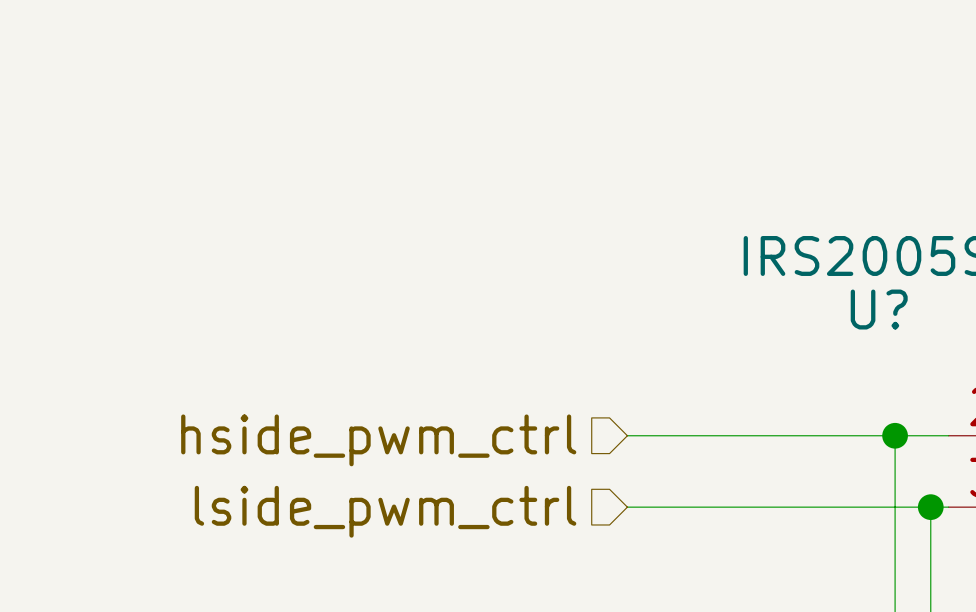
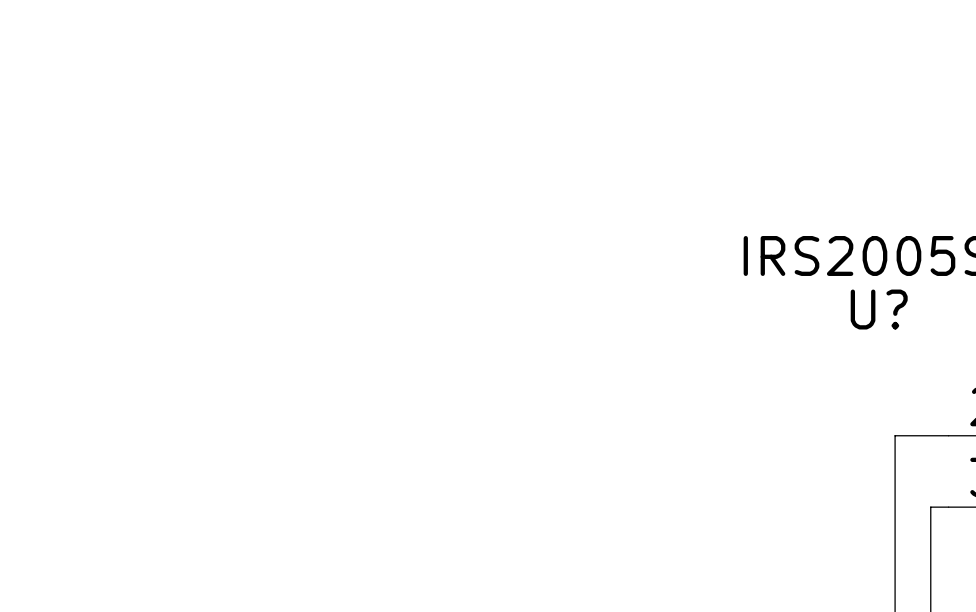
wire: (627, 435) (895, 435) -> none
junction: (895, 435) -> none
hierarchical label: hside_pwm_ctrl (378, 440) -> none
wire: (627, 507) (930, 507) -> none
junction: (930, 507) -> none
hierarchical label: lside_pwm_ctrl (385, 511) -> none

